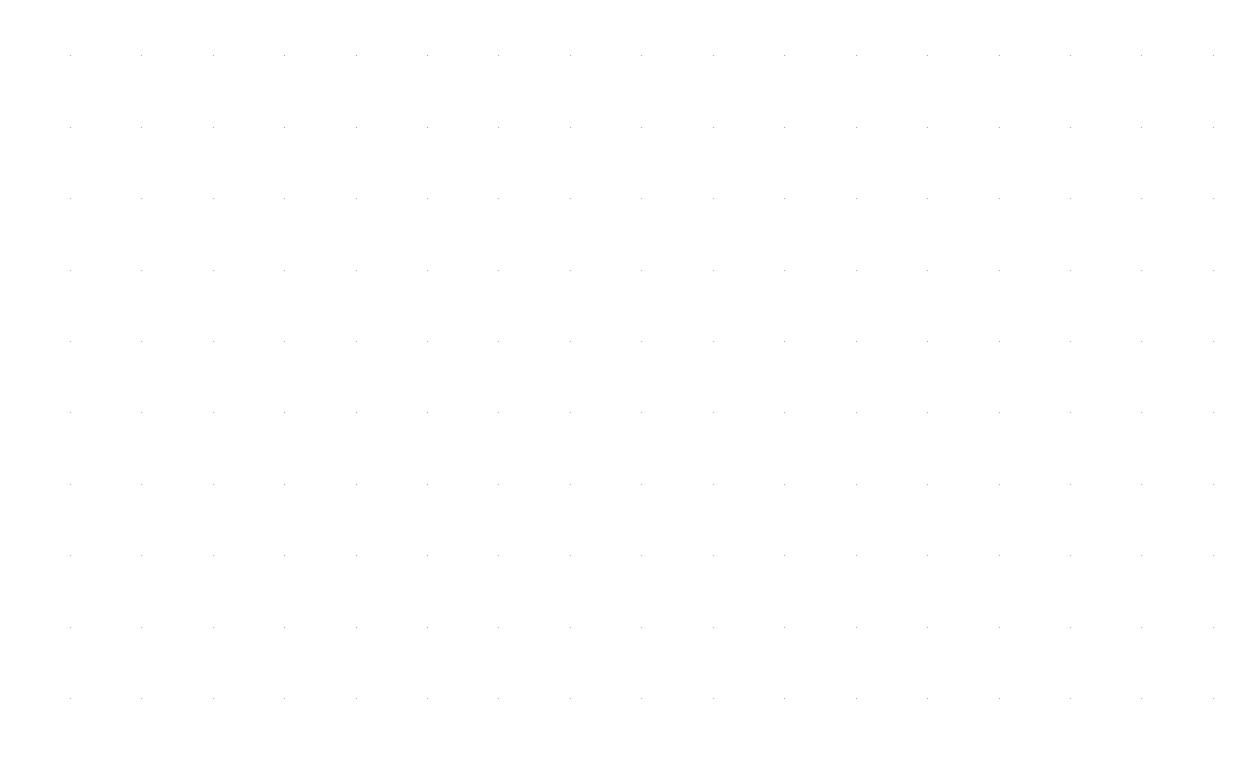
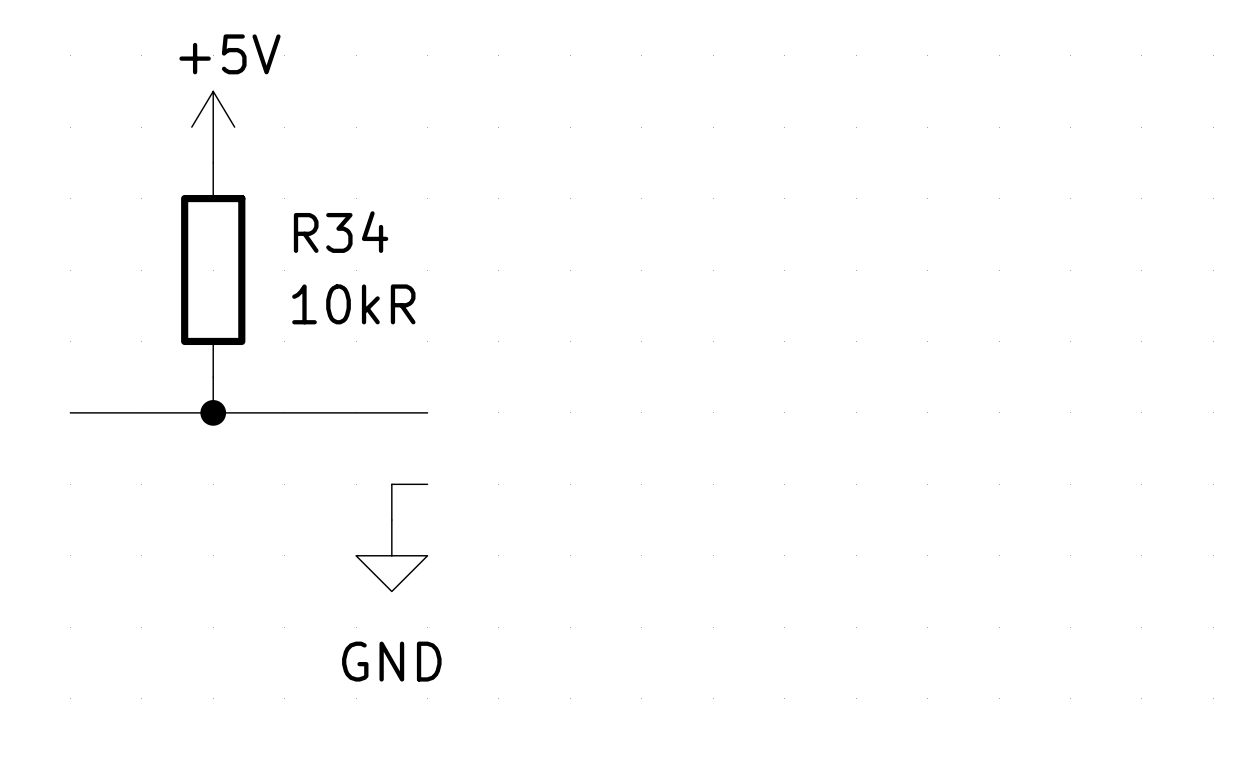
power symbol: none -> +5V (213, 127)
R34: none -> 10kR (213, 270)
wire: none -> (213, 377) (213, 412)
wire: none -> (70, 412) (427, 412)
junction: none -> (213, 412)
wire: none -> (427, 484) (391, 484) (391, 520)
power symbol: none -> GND (391, 555)

